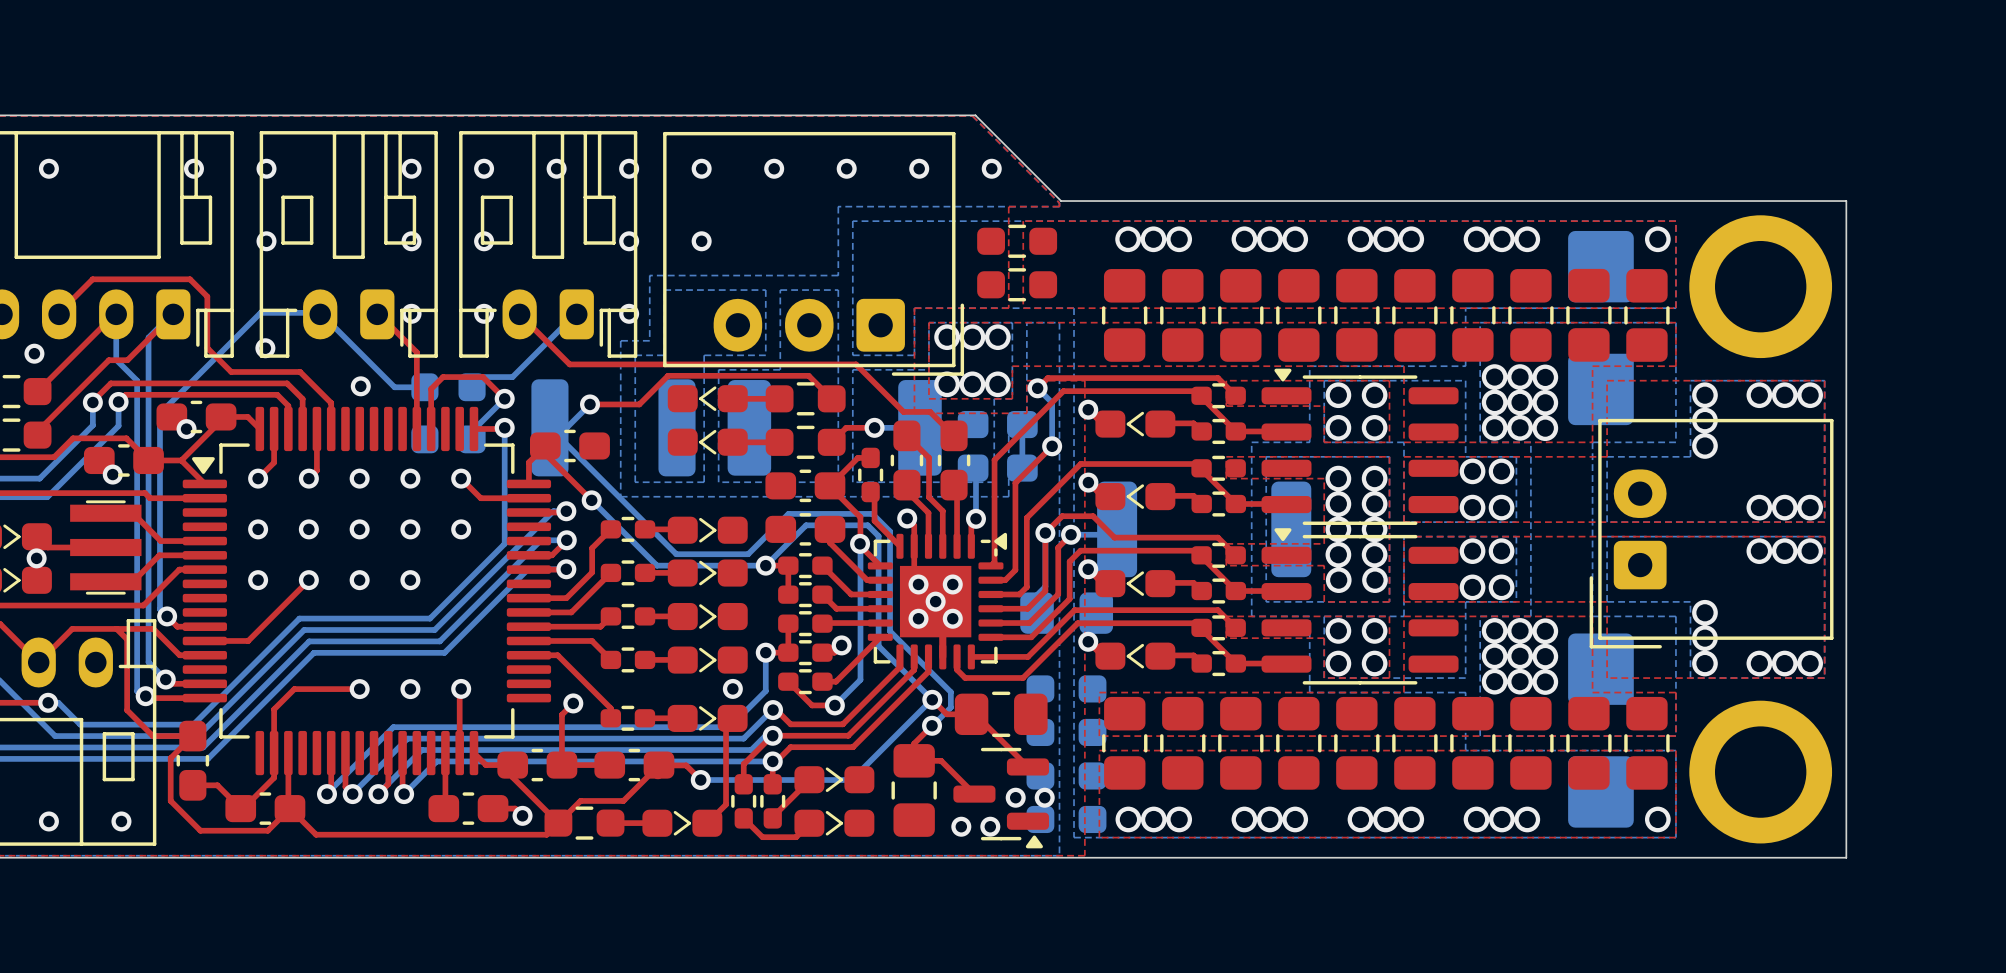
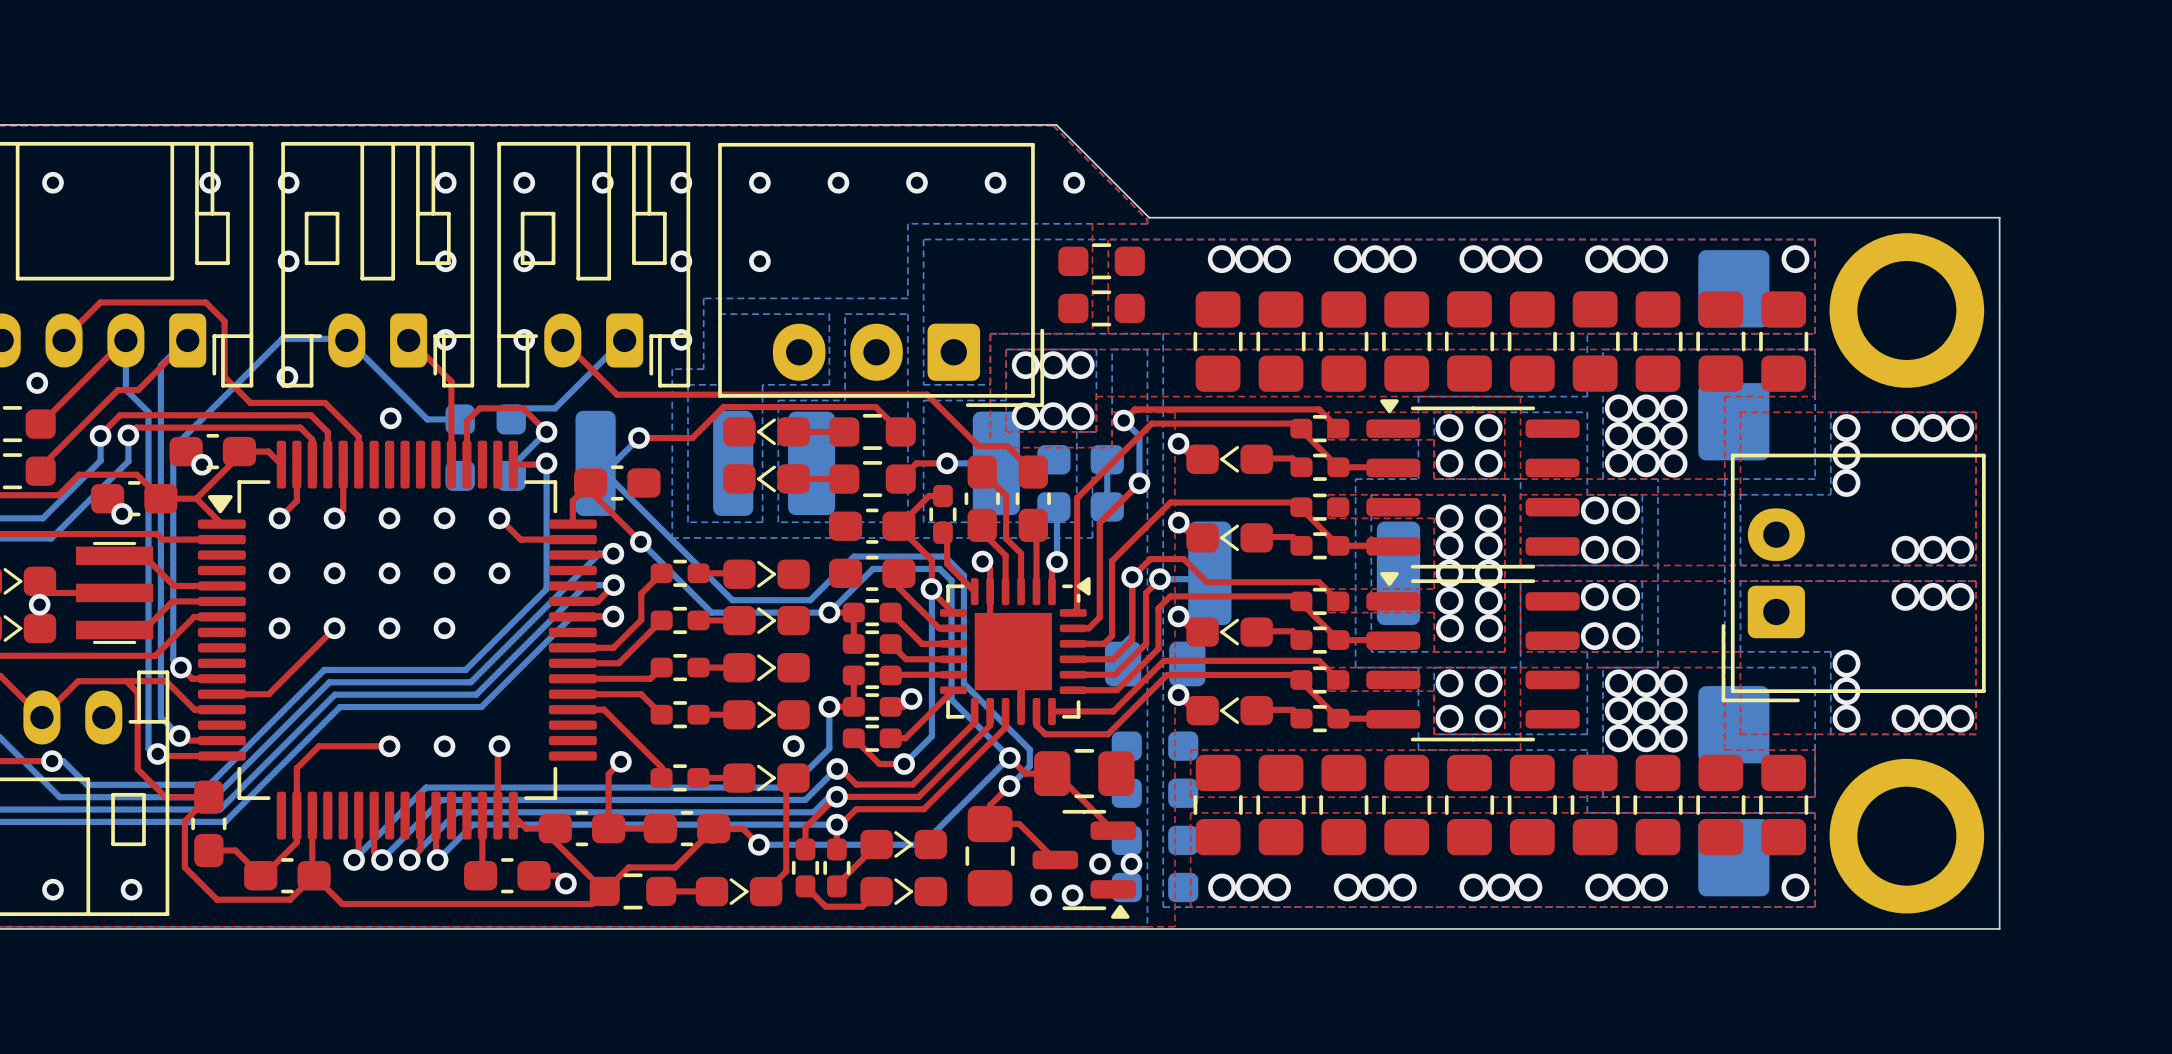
via: (918, 584) -> none
via: (952, 584) -> none
via: (935, 601) -> none
via: (918, 618) -> none
via: (952, 618) -> none

